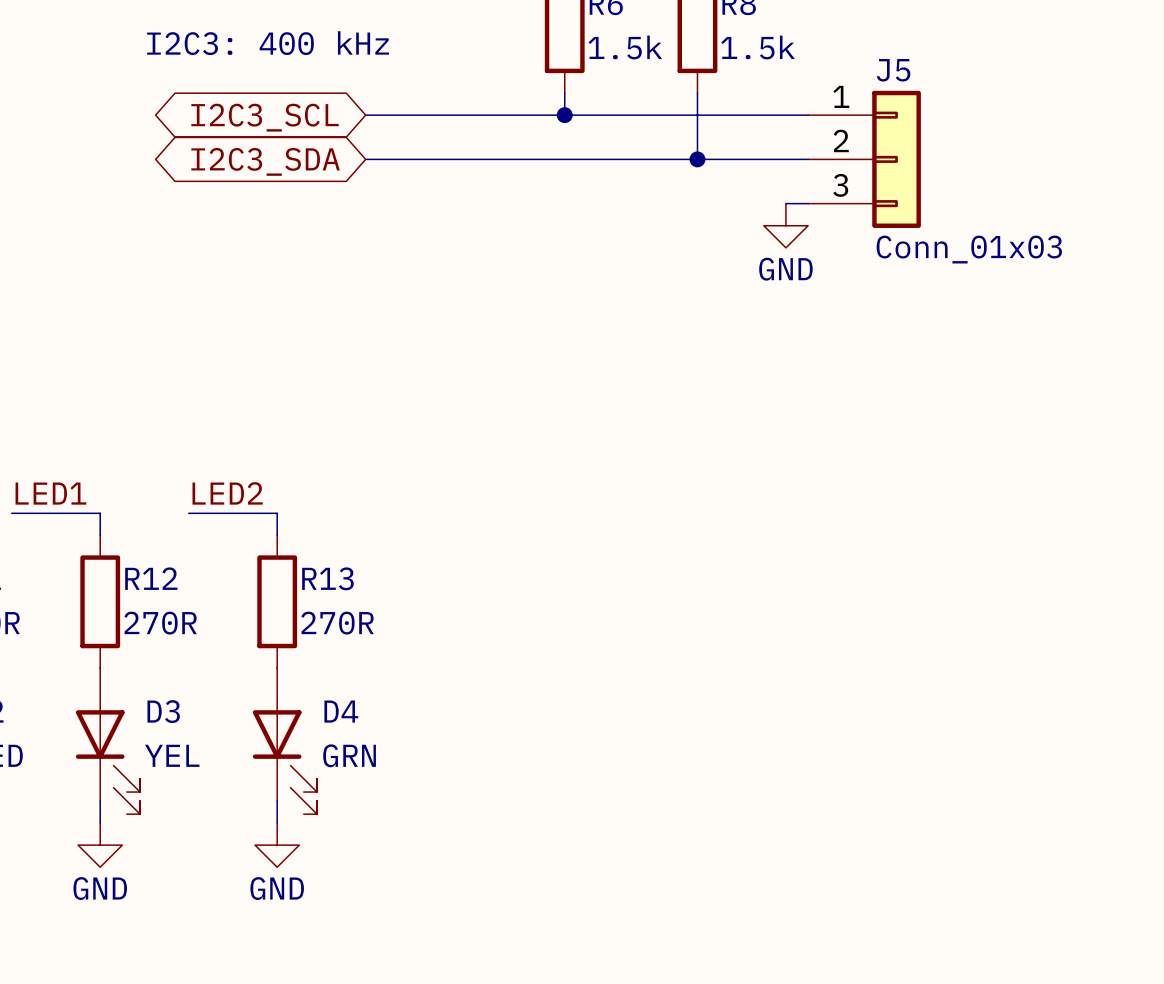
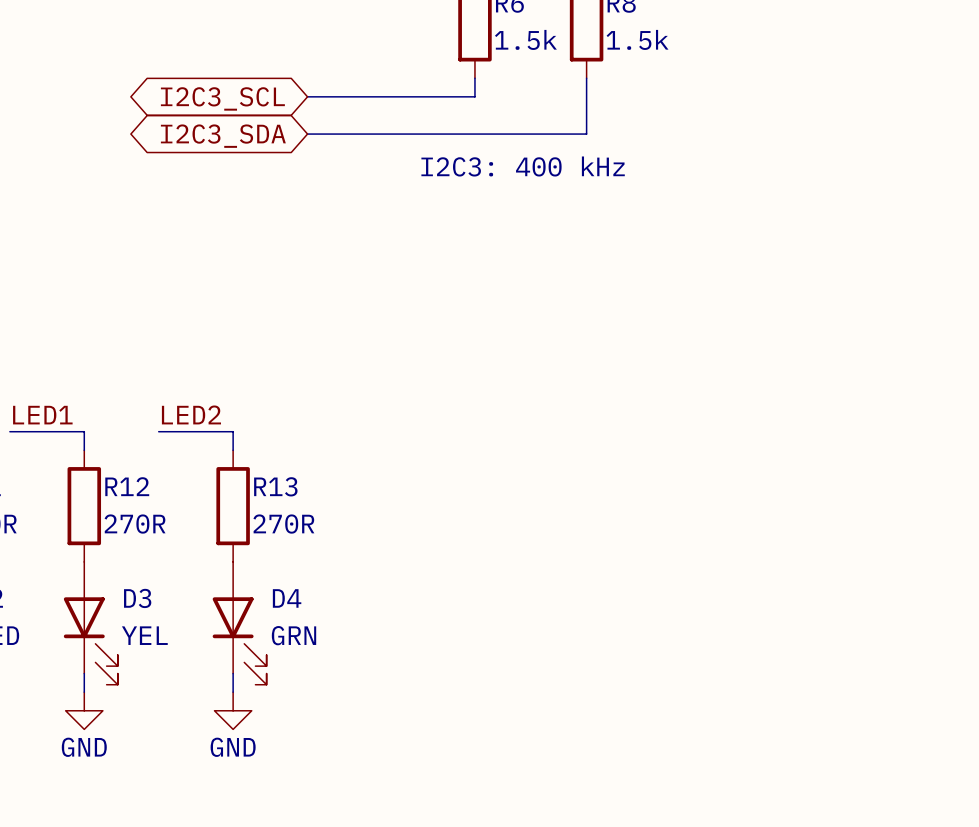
text position: I2C3: 400 kHz (268, 43) -> I2C3: 400 kHz (523, 166)
wire: (564, 115) (808, 115) -> none
junction: (564, 115) -> none
wire: (697, 159) (808, 159) -> none
junction: (697, 159) -> none
J5: Conn_01x03 (864, 159) -> none
wire: (785, 203) (808, 203) -> none
power symbol: GND (785, 225) -> none

